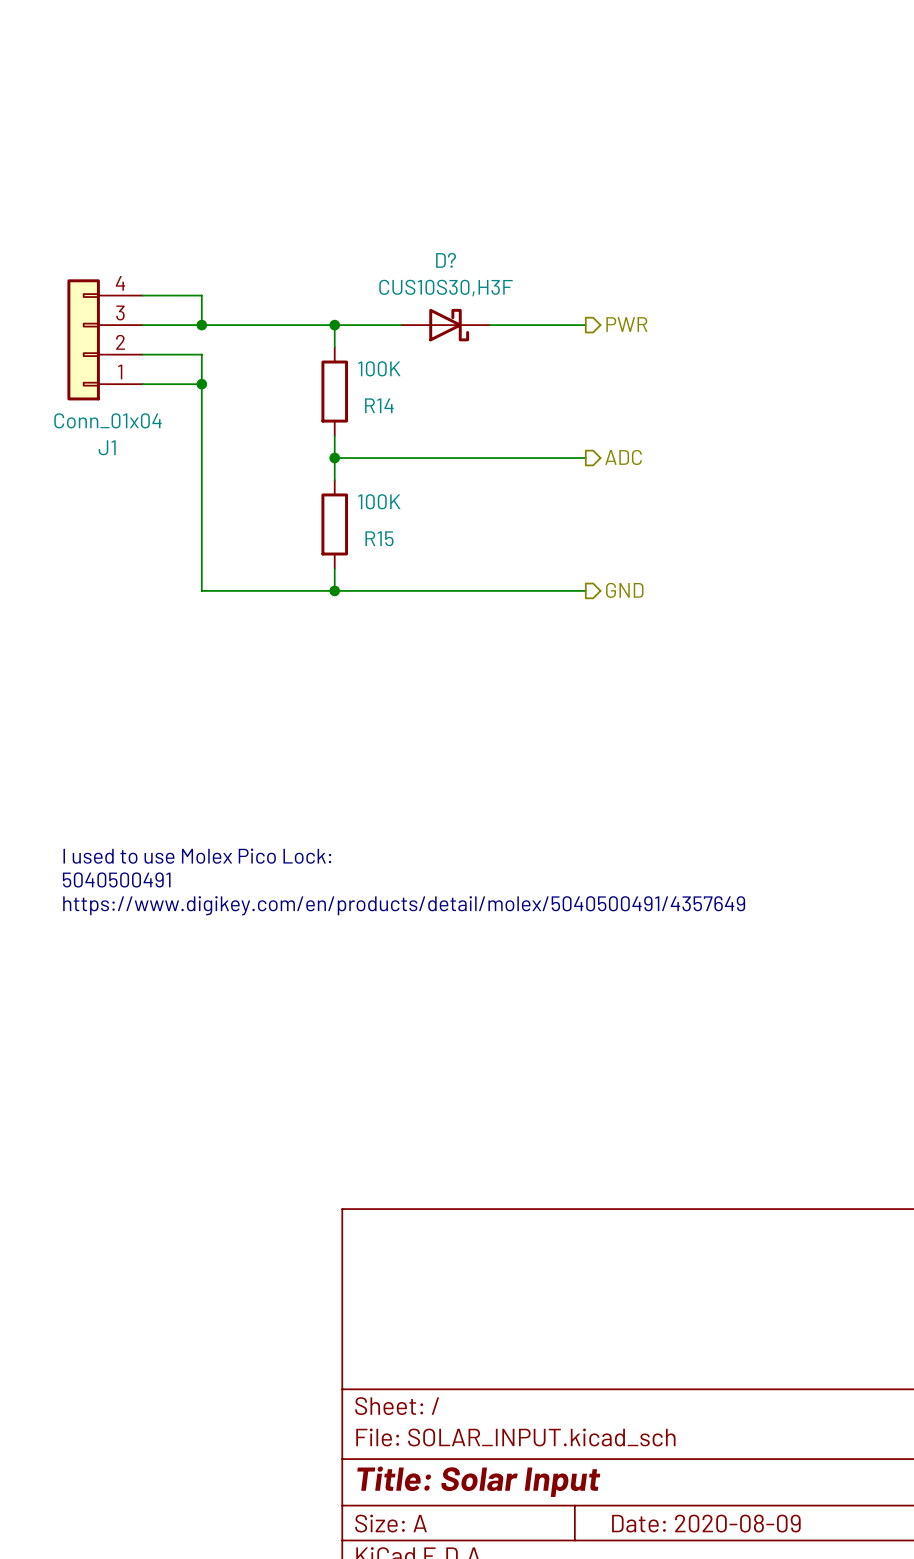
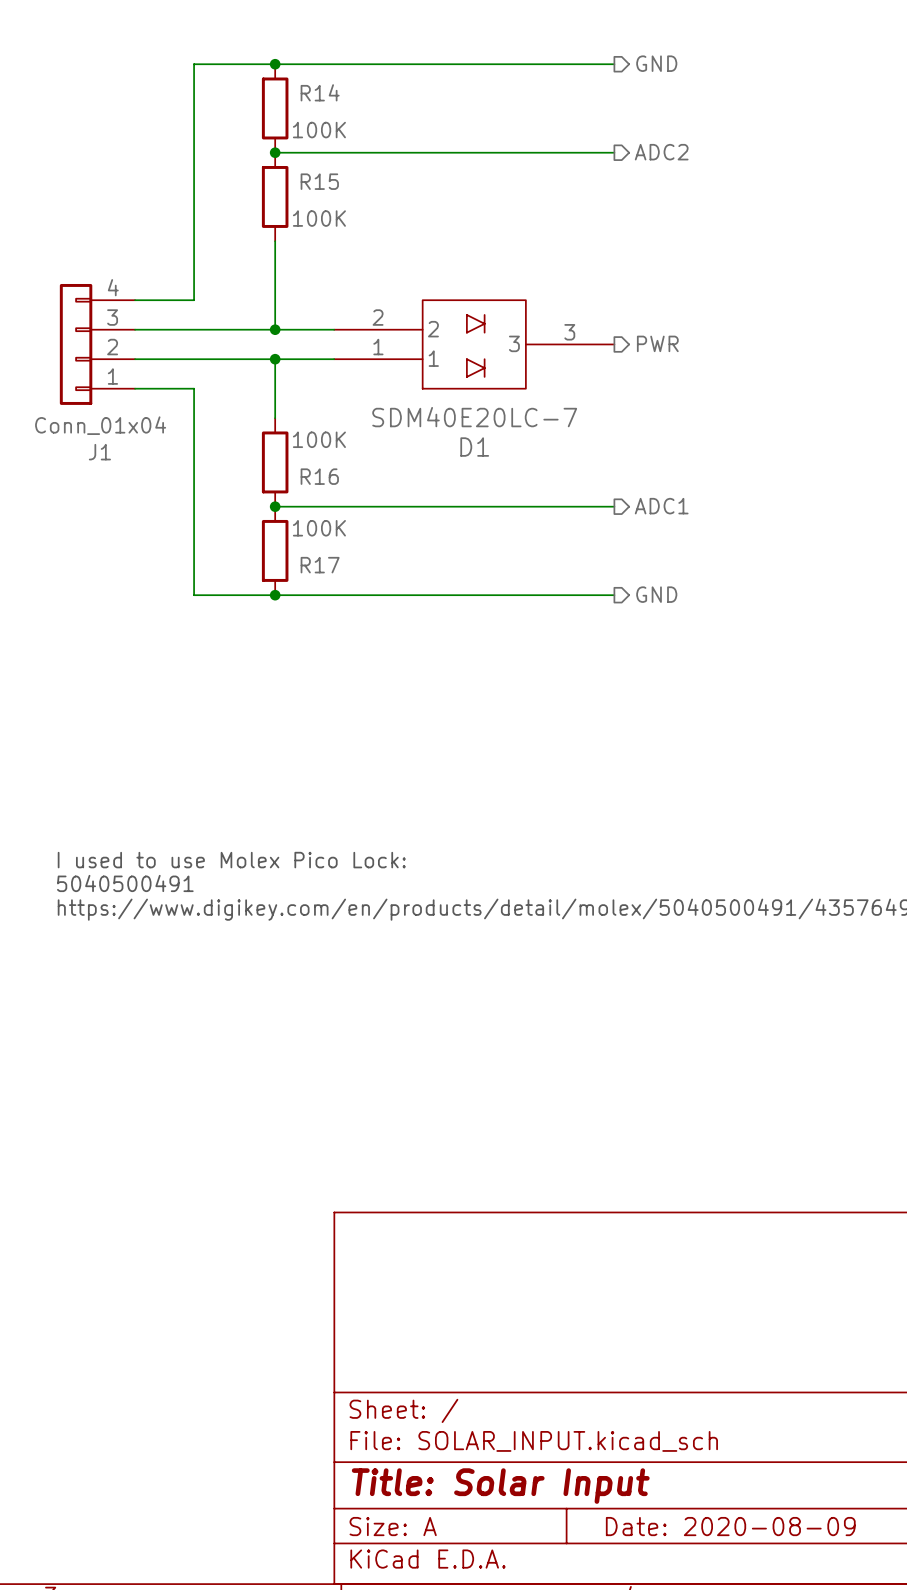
hierarchical label: none -> GND (656, 63)
junction: none -> (275, 64)
wire: none -> (275, 152) (614, 152)
junction: none -> (275, 152)
hierarchical label: none -> ADC2 (661, 152)
wire: none -> (275, 241) (275, 329)
wire: (201, 295) (201, 325) -> (194, 300) (194, 64) (614, 64)
hierarchical label position: PWR (626, 324) -> PWR (657, 343)
junction: (201, 325) -> none
junction: none -> (275, 329)
wire: (334, 325) (334, 347) -> none
junction: (334, 325) -> none
D?: CUS10S30,H3F (445, 325) -> none
wire: (489, 325) (585, 325) -> none
D1: none -> SDM40E20LC-7 (474, 344)
wire: (201, 354) (201, 384) -> (194, 359) (334, 359)
wire: none -> (275, 359) (275, 418)
junction: none -> (275, 359)
R14 value position: 100K (379, 368) -> 100K (319, 130)
junction: (201, 384) -> none
R14 position: (334, 391) -> (275, 108)
R14 name position: R14 (379, 405) -> R14 (320, 92)
wire: (334, 435) (334, 480) -> none
hierarchical label: ADC (623, 457) -> none
R16: none -> 100K (275, 462)
wire: (334, 458) (585, 458) -> none
junction: (334, 458) -> none
R15 value position: 100K (379, 501) -> 100K (319, 218)
hierarchical label: none -> ADC1 (661, 506)
wire: none -> (275, 506) (614, 506)
junction: none -> (275, 506)
R15 position: (334, 524) -> (275, 196)
R15 name position: R15 (379, 538) -> R15 (319, 181)
R17: none -> 100K (275, 550)
wire: (334, 568) (334, 590) -> none
junction: none -> (275, 595)
junction: (334, 590) -> none
wire: none -> (577, 595) (614, 595)
hierarchical label position: GND (624, 590) -> GND (656, 594)

